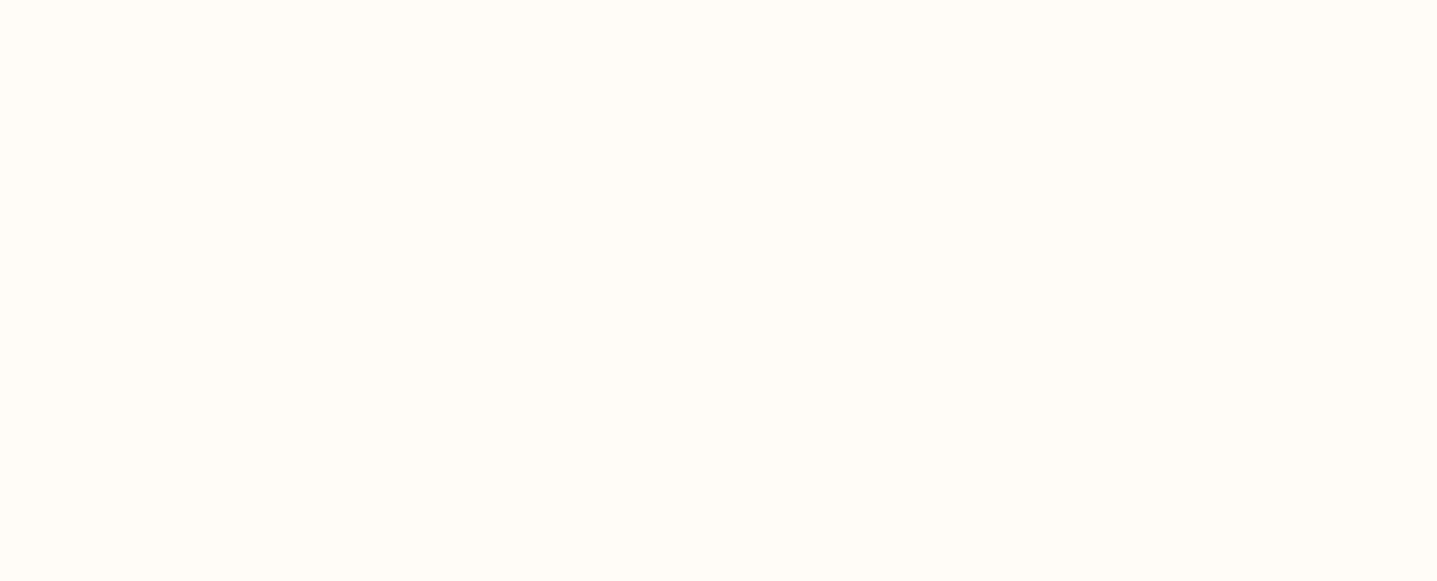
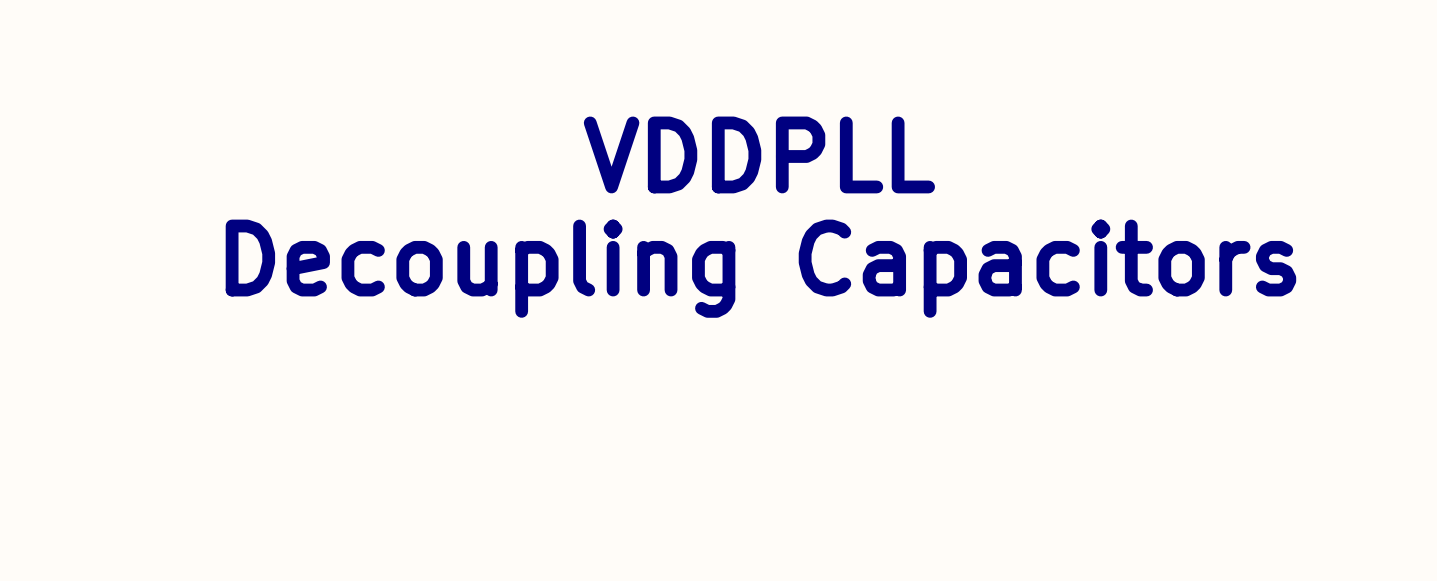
text: none -> VDDPLL (759, 154)
text: none -> Decoupling Capacitors (760, 268)

